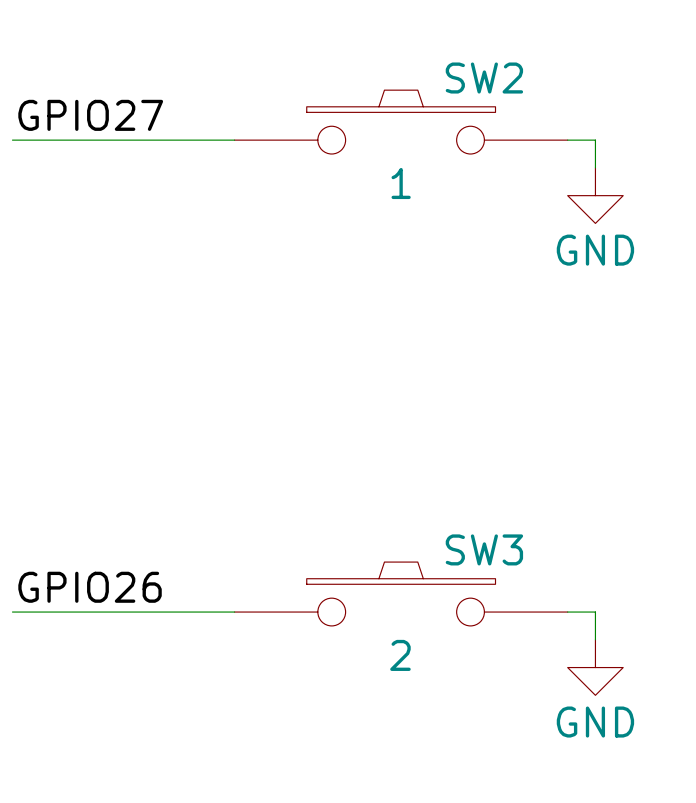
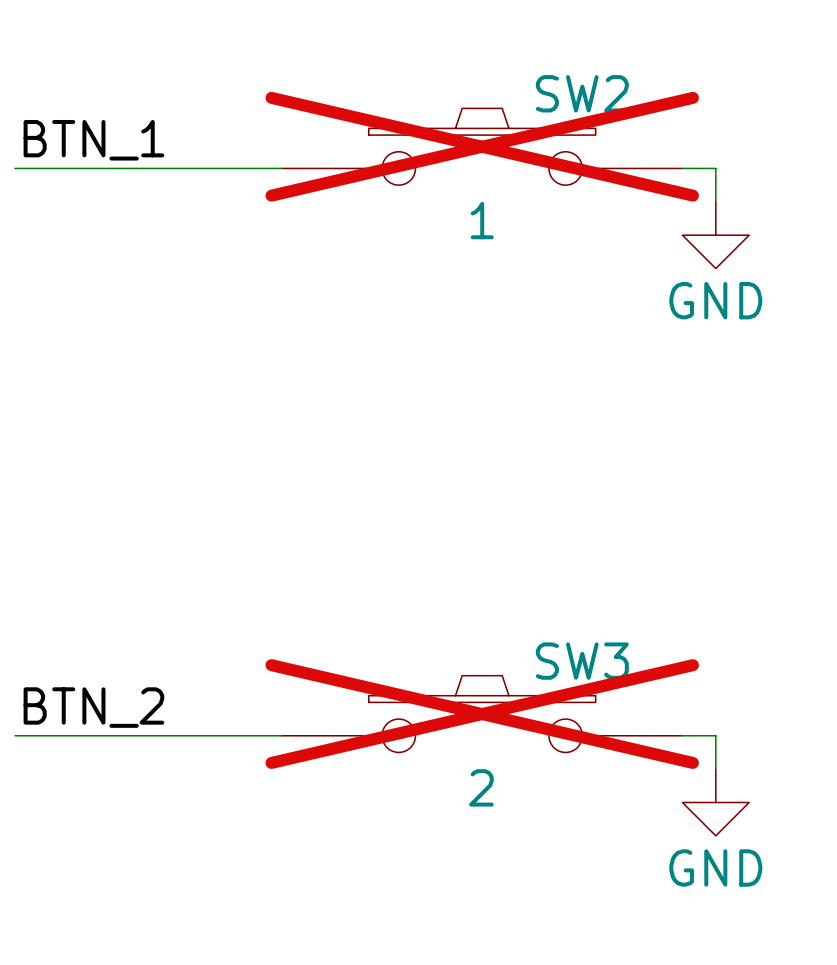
label: GPIO27 (90, 115) -> BTN_1 (93, 140)
SW2 do-not-place cross: none -> (482, 146)
label: GPIO26 (90, 587) -> BTN_2 (93, 707)
SW3 do-not-place cross: none -> (482, 714)

